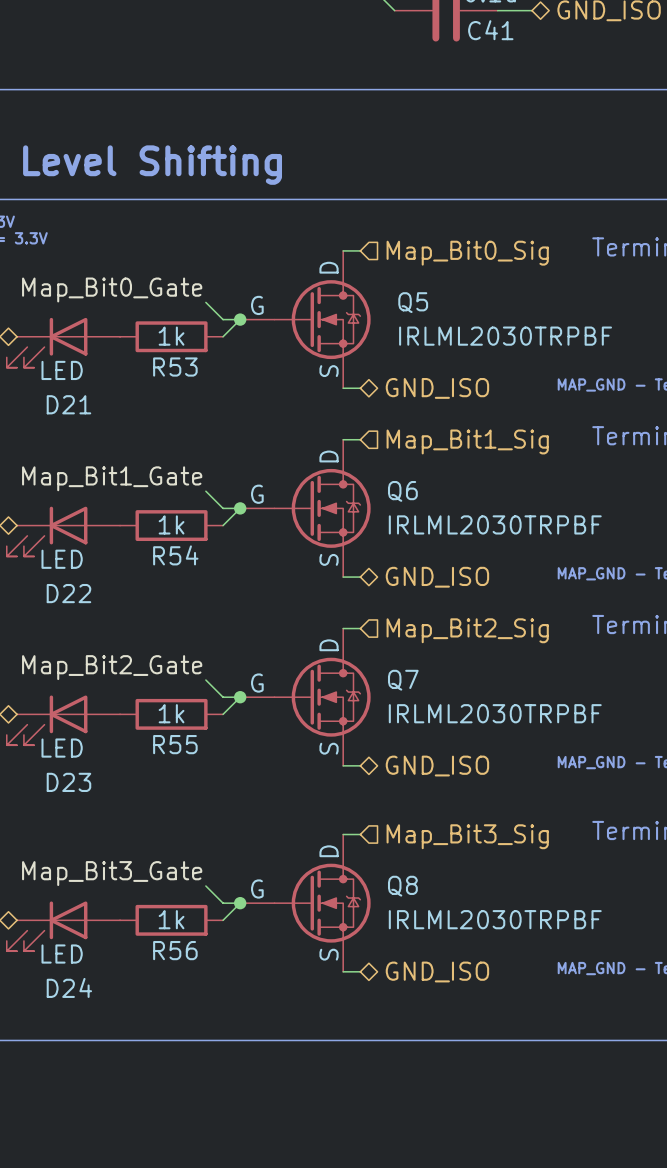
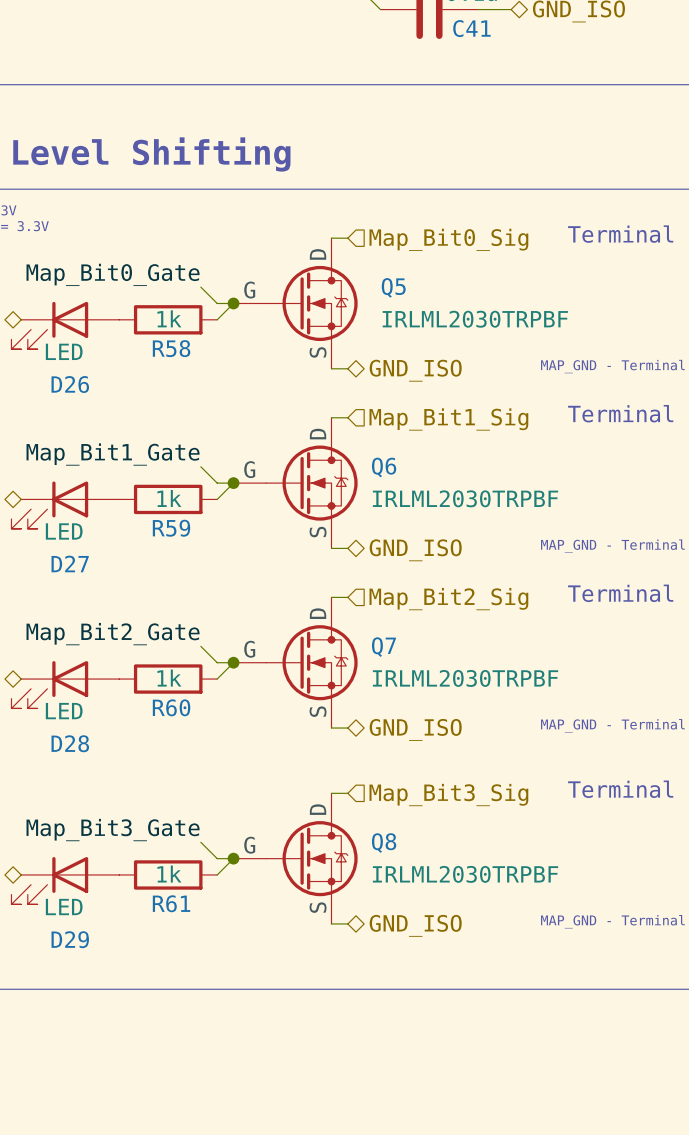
R53 name: R53 (175, 367) -> R58 (171, 348)
D21 name: D21 (68, 404) -> D26 (70, 384)
R54 name: R54 (175, 555) -> R59 (171, 528)
D22 name: D22 (68, 593) -> D27 (70, 563)
R55 name: R55 (175, 744) -> R60 (171, 707)
D23 name: D23 (68, 782) -> D28 (70, 743)
R56 name: R56 (175, 950) -> R61 (171, 903)
D24 name: D24 (69, 987) -> D29 (70, 939)

